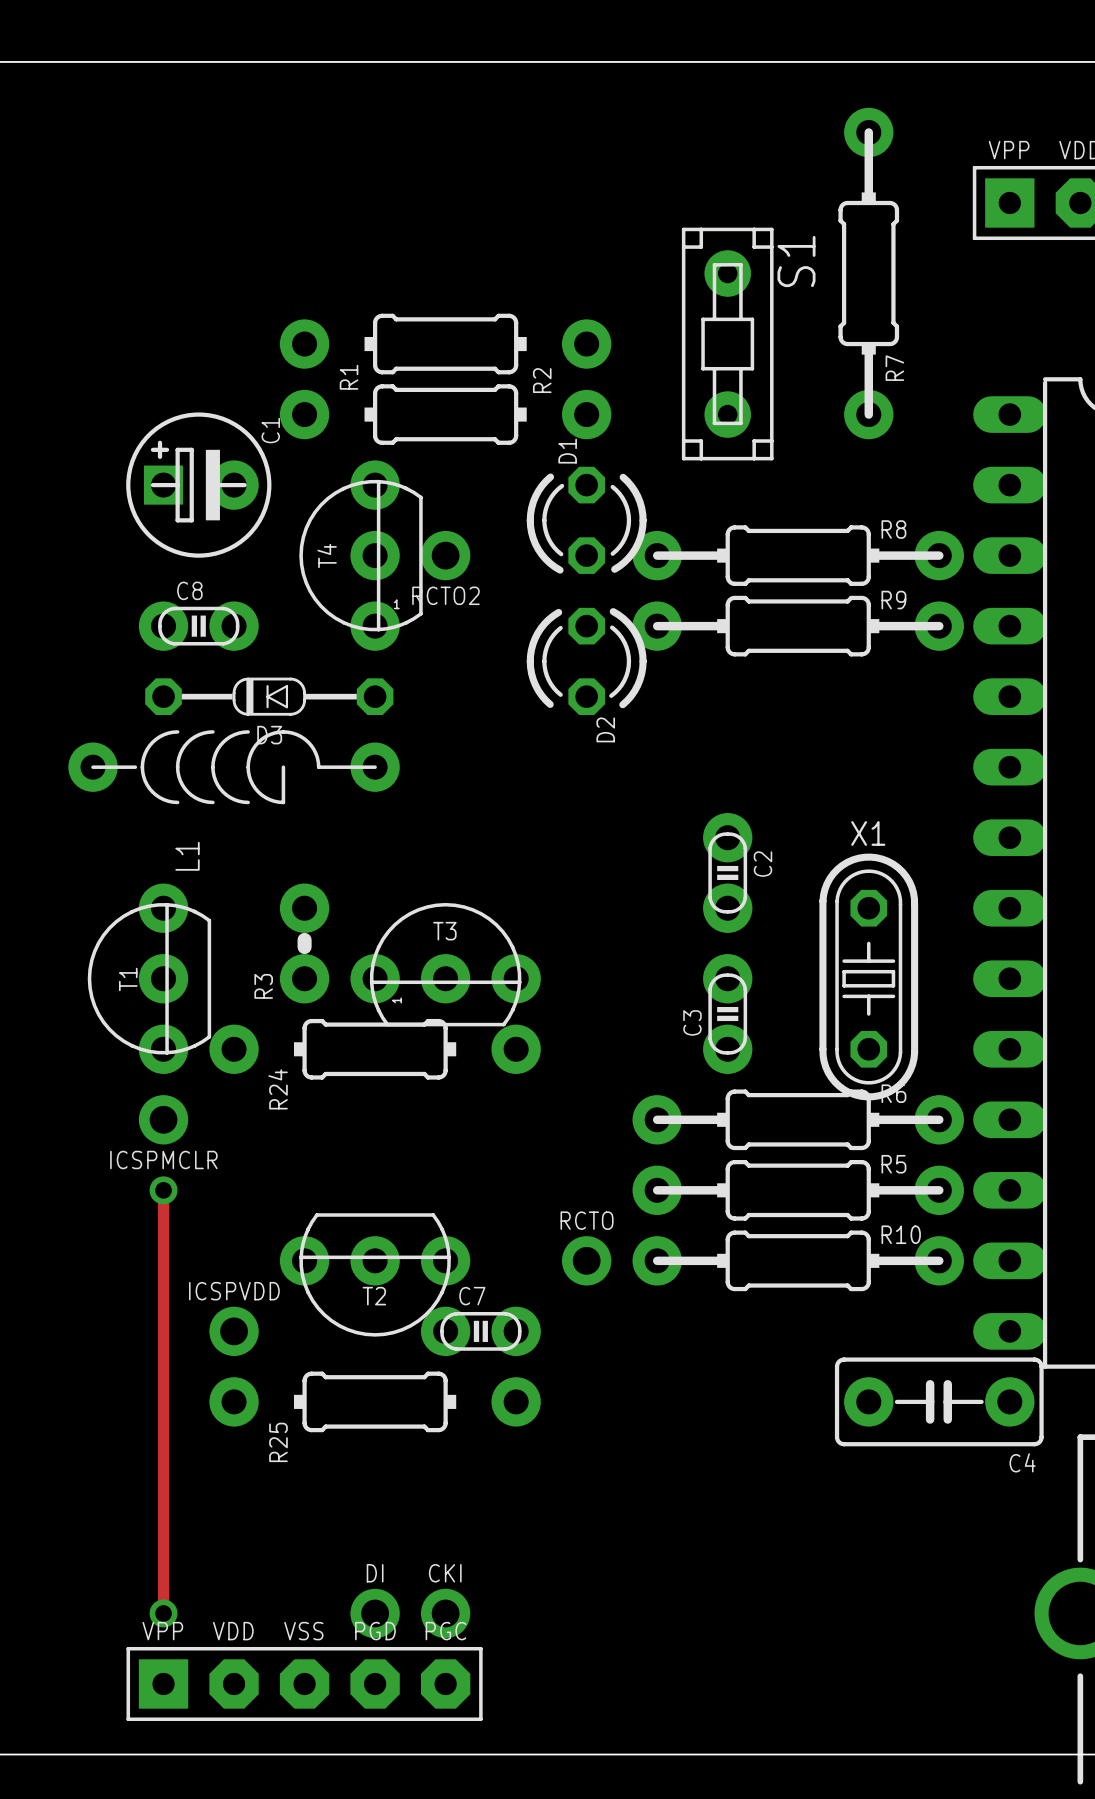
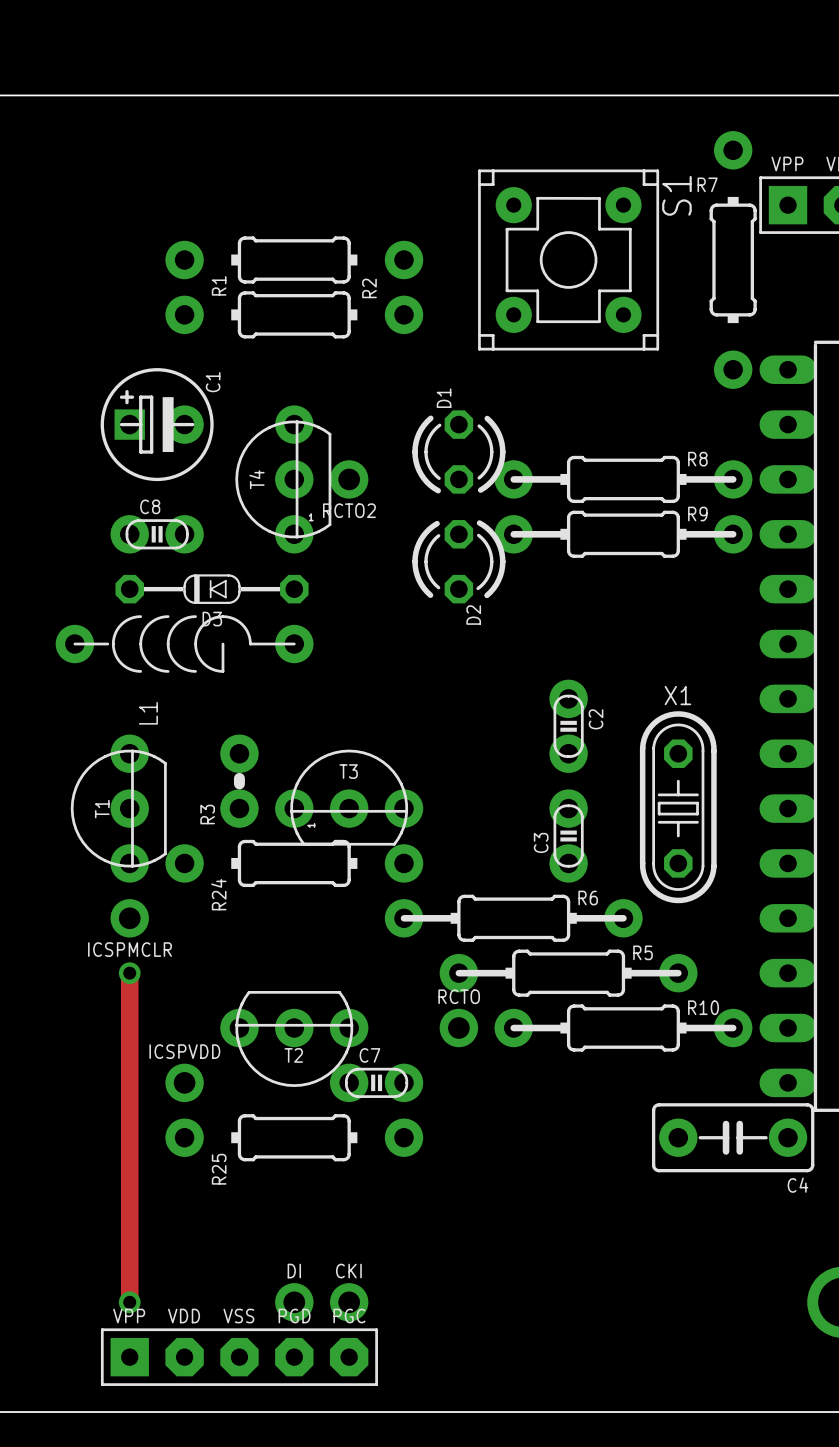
R7 footprint: [838, 107, 900, 440] -> [709, 131, 757, 389]
S1 footprint: [681, 227, 774, 461] -> [478, 169, 660, 351]
S1 name position: S1 (796, 261) -> S1 (676, 195)
R1 position: (445, 344) -> (294, 260)
R7 name position: R7 (894, 368) -> R7 (707, 184)
R2 position: (445, 414) -> (294, 314)
R6 position: (798, 1119) -> (513, 918)
track width: thin (163, 1190) (163, 1613) -> thick (129, 973) (129, 1302)
R5 position: (798, 1190) -> (568, 973)

